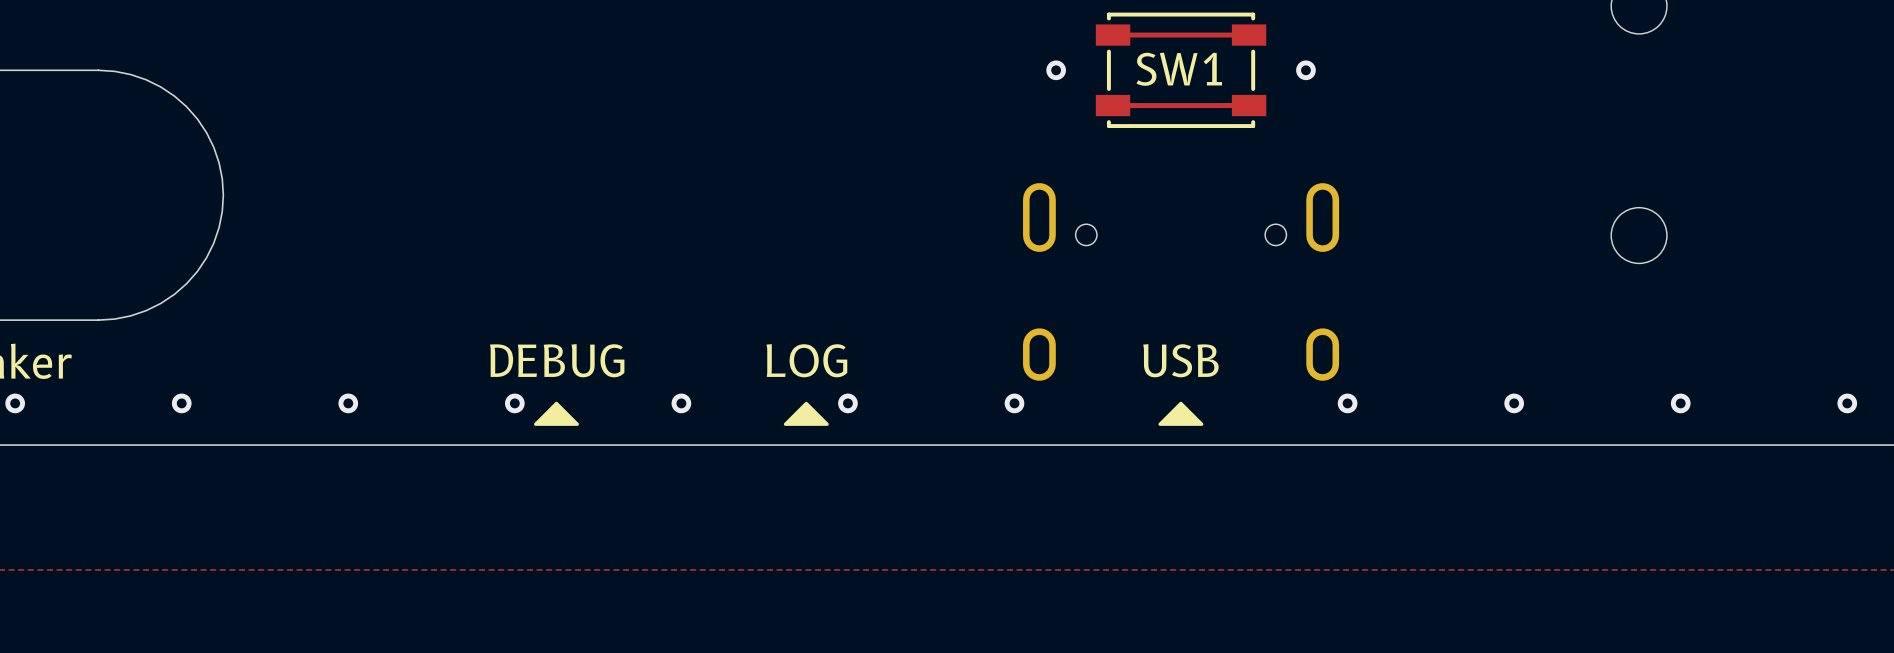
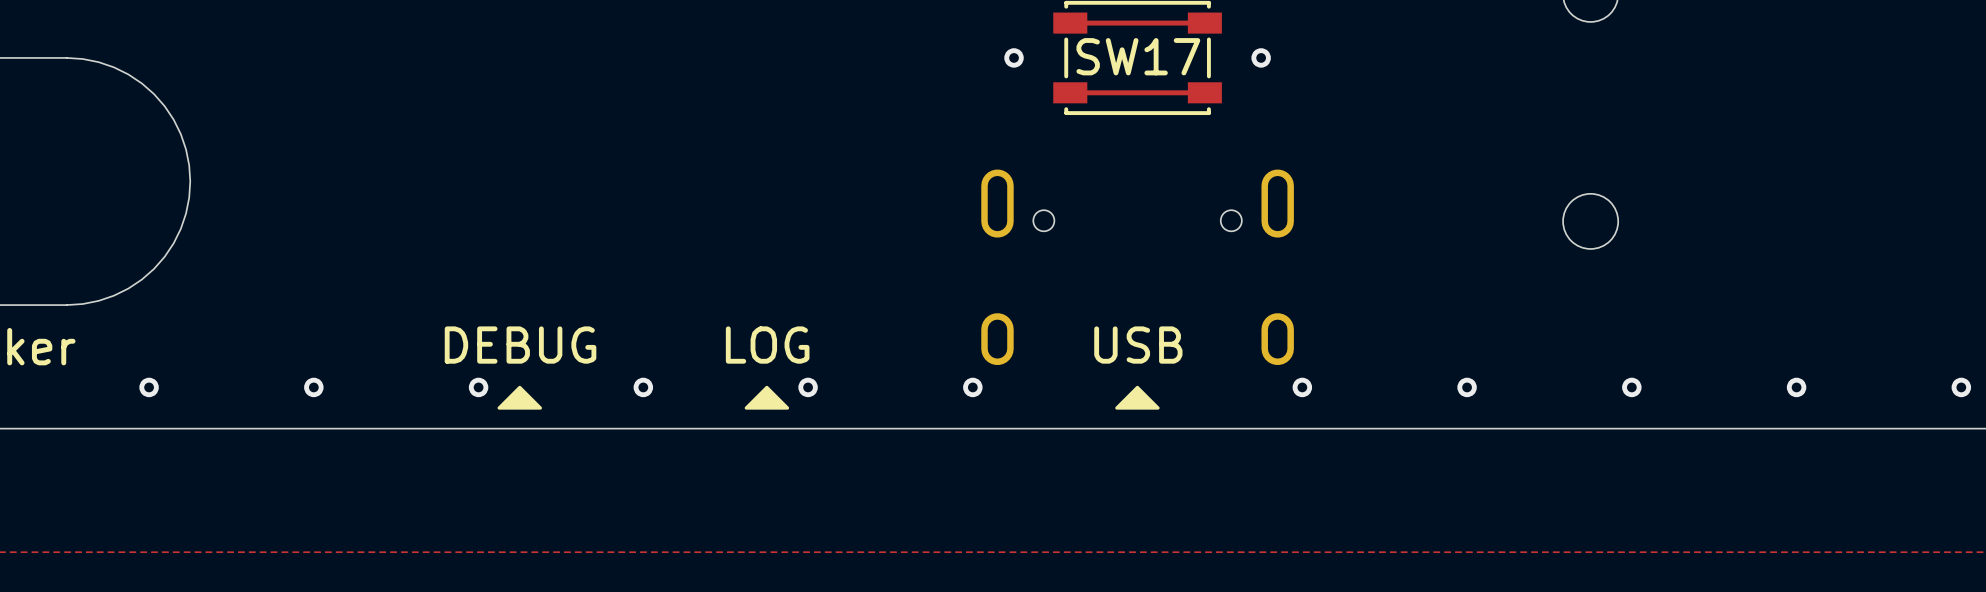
SW1 name: SW1 (1179, 69) -> SW17 (1138, 56)

